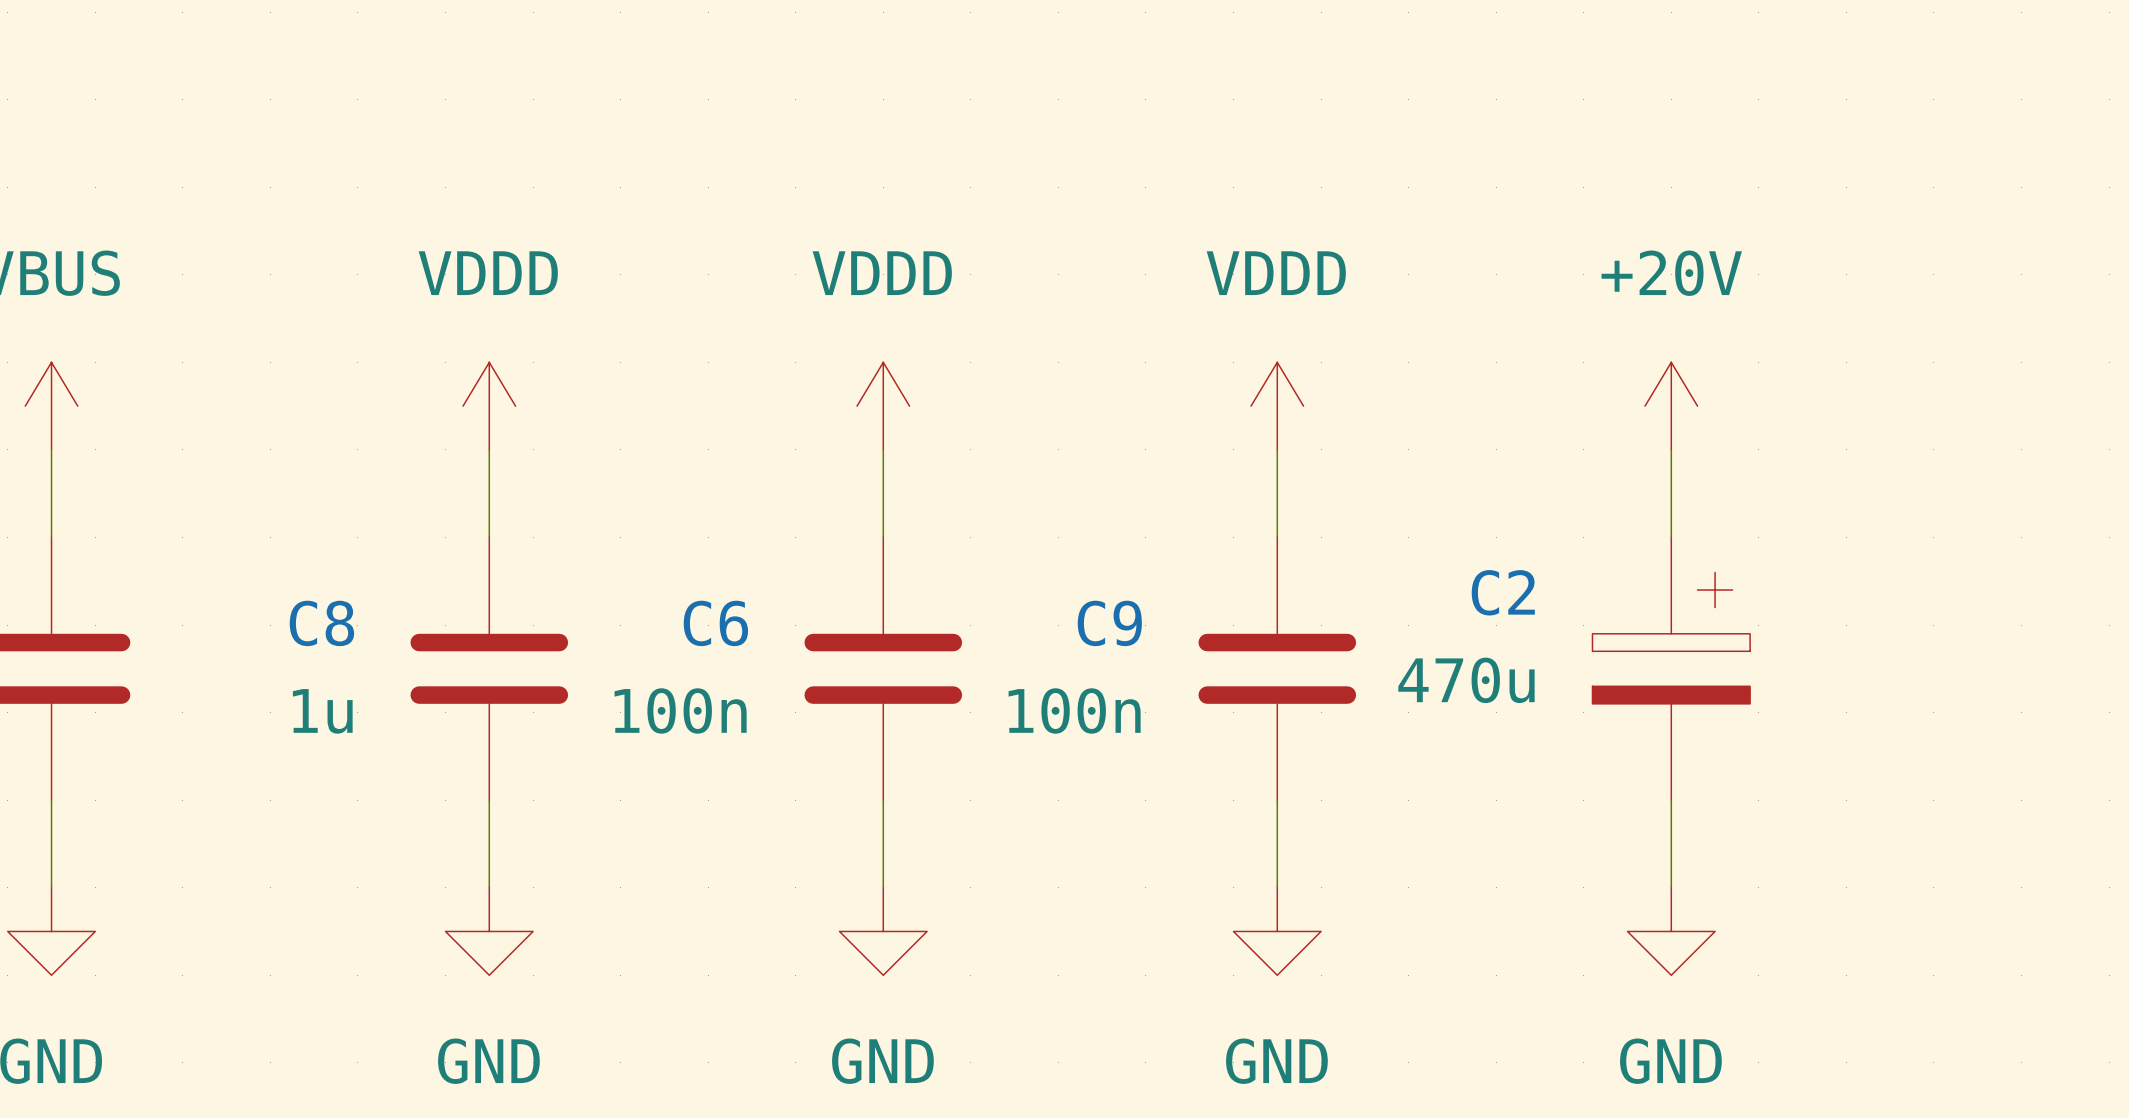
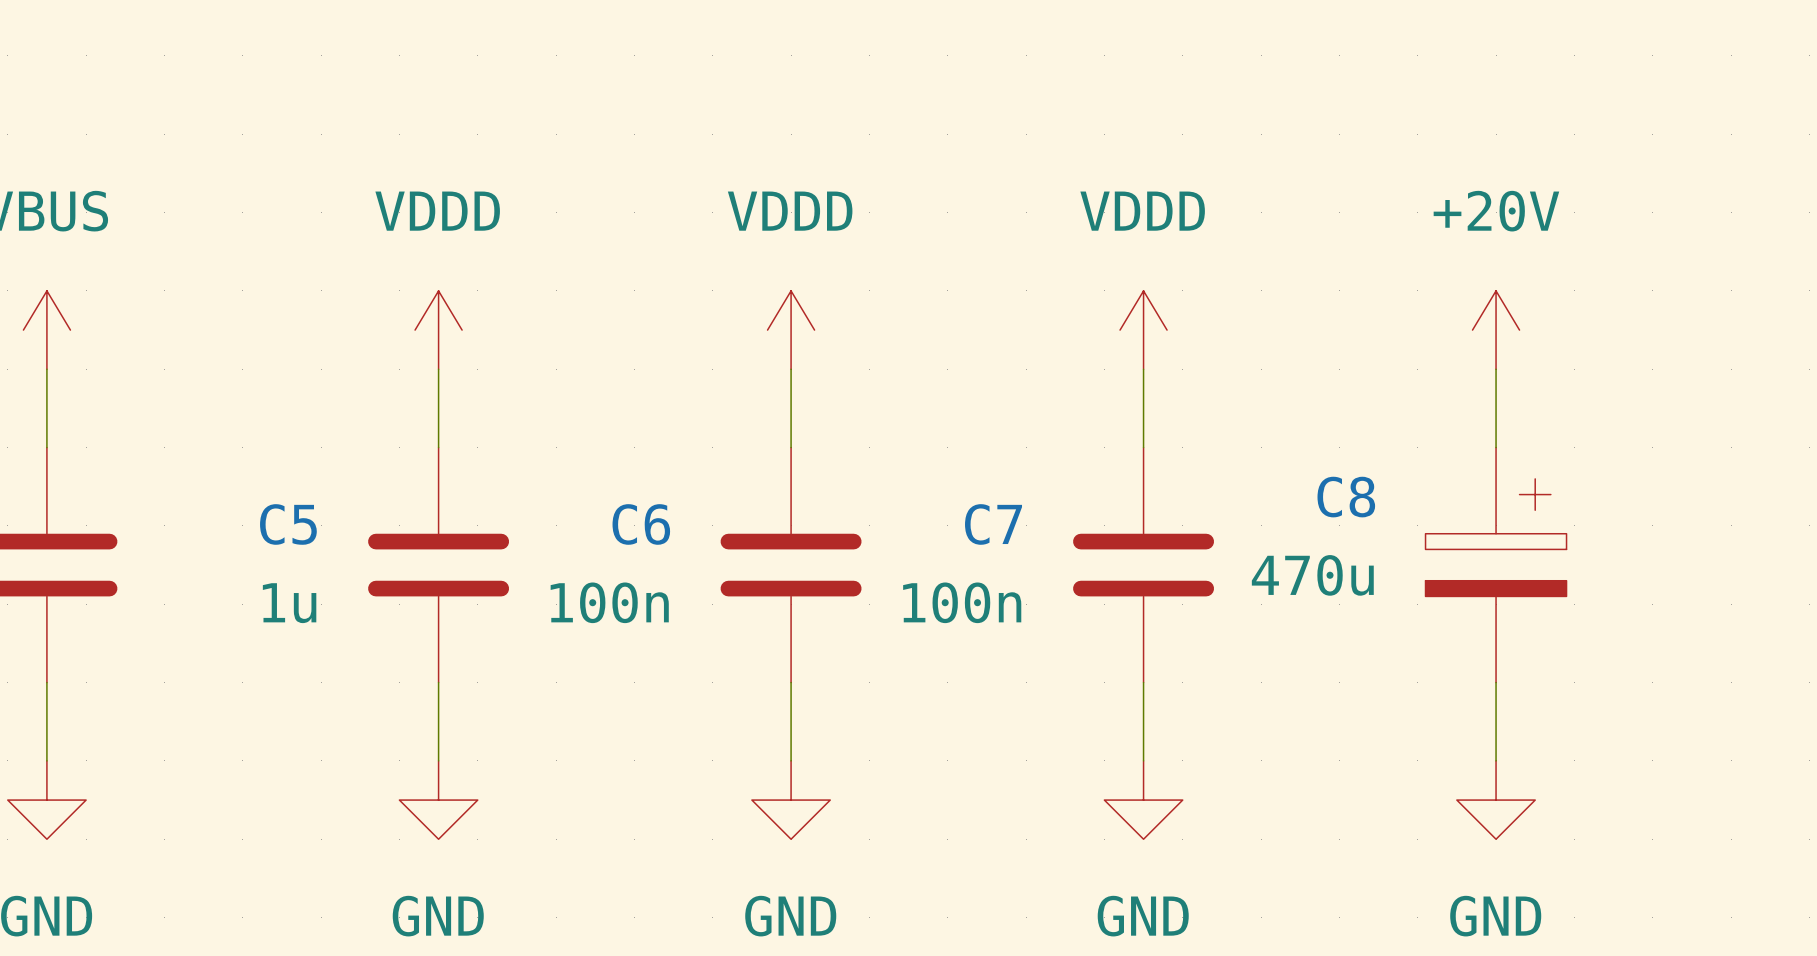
C2 name: C2 (1503, 592) -> C8 (1346, 497)
C8 name: C8 (321, 623) -> C5 (288, 524)
C9 name: C9 (1109, 623) -> C7 (993, 524)

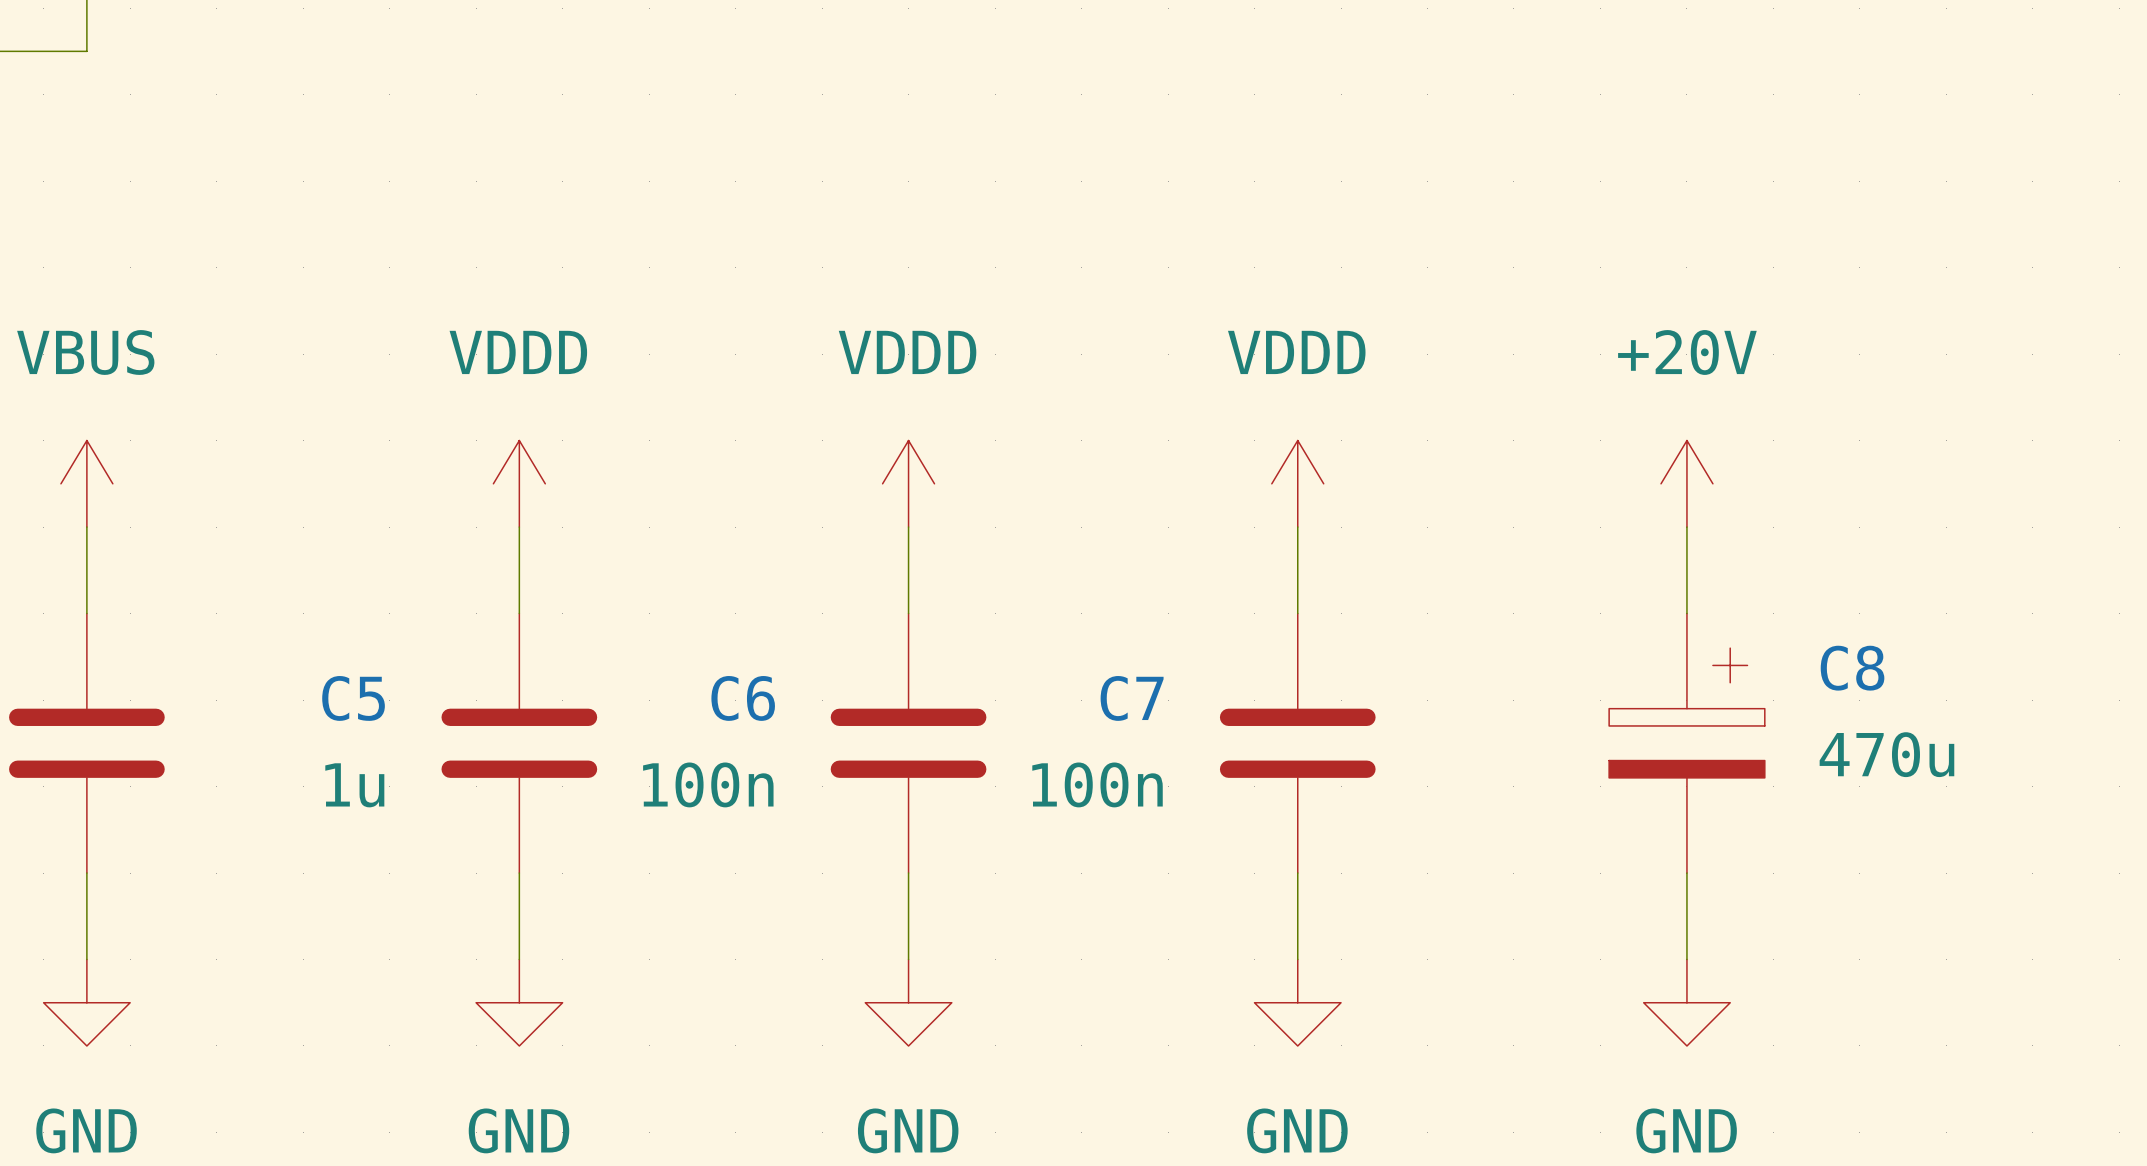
C8 name position: C8 (1346, 497) -> C8 (1852, 668)
C8 value position: 470u (1312, 575) -> 470u (1886, 754)

